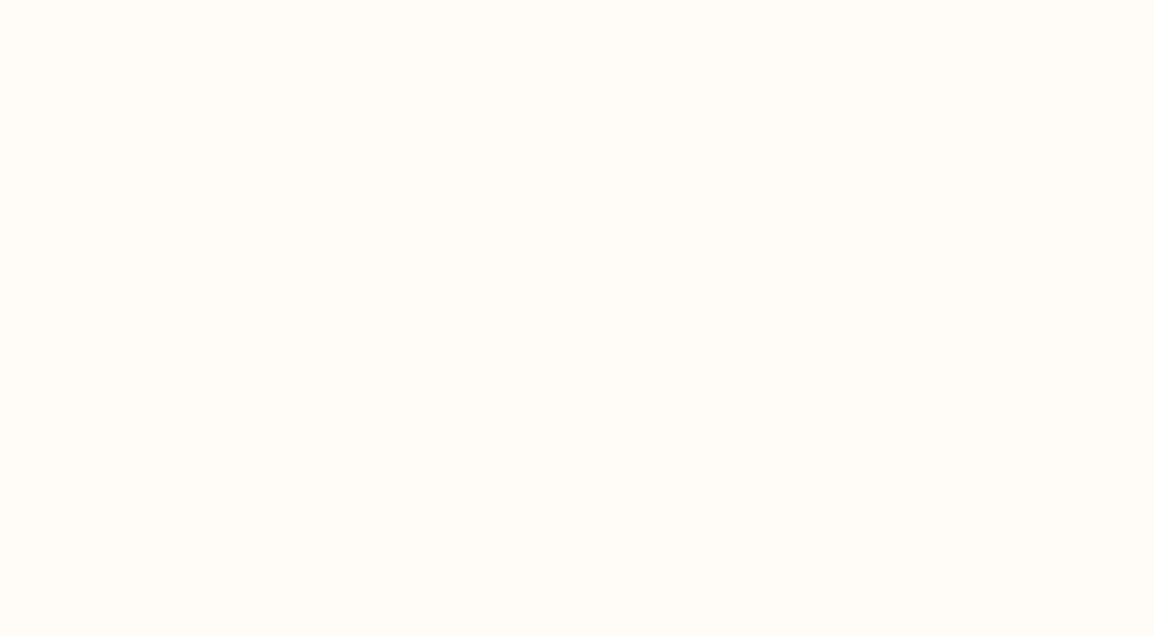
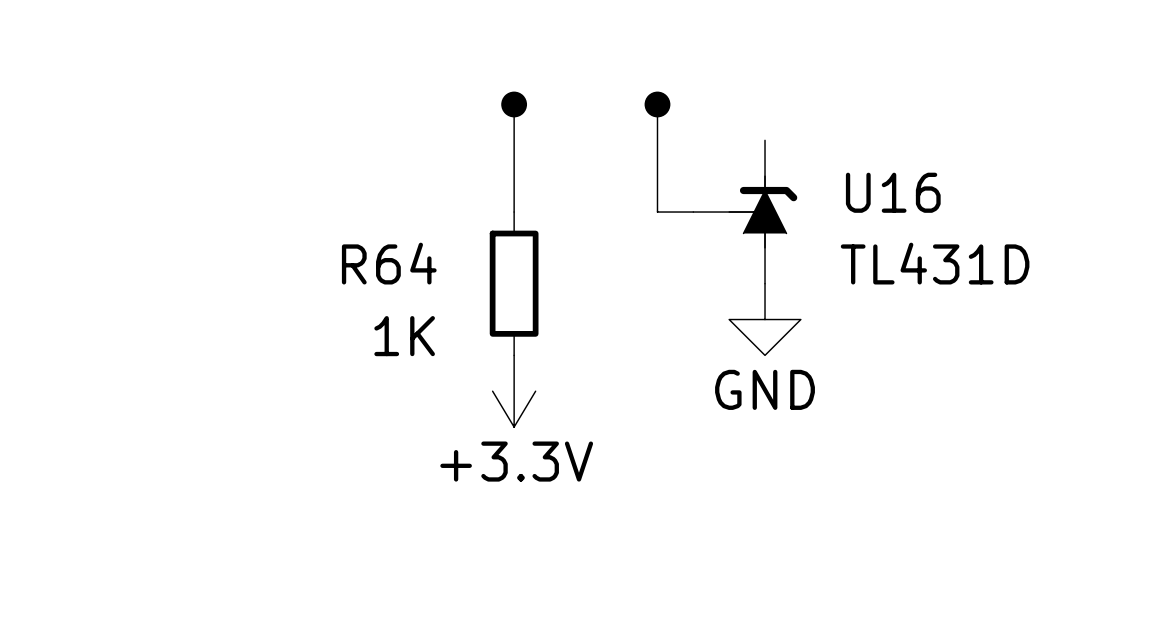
wire: none -> (514, 104) (514, 212)
junction: none -> (514, 104)
wire: none -> (657, 104) (657, 212) (693, 212)
junction: none -> (657, 104)
U16: none -> TL431D (745, 212)
R64: none -> 1K (514, 283)
power symbol: none -> GND (765, 319)
power symbol: none -> +3.3V (514, 391)

